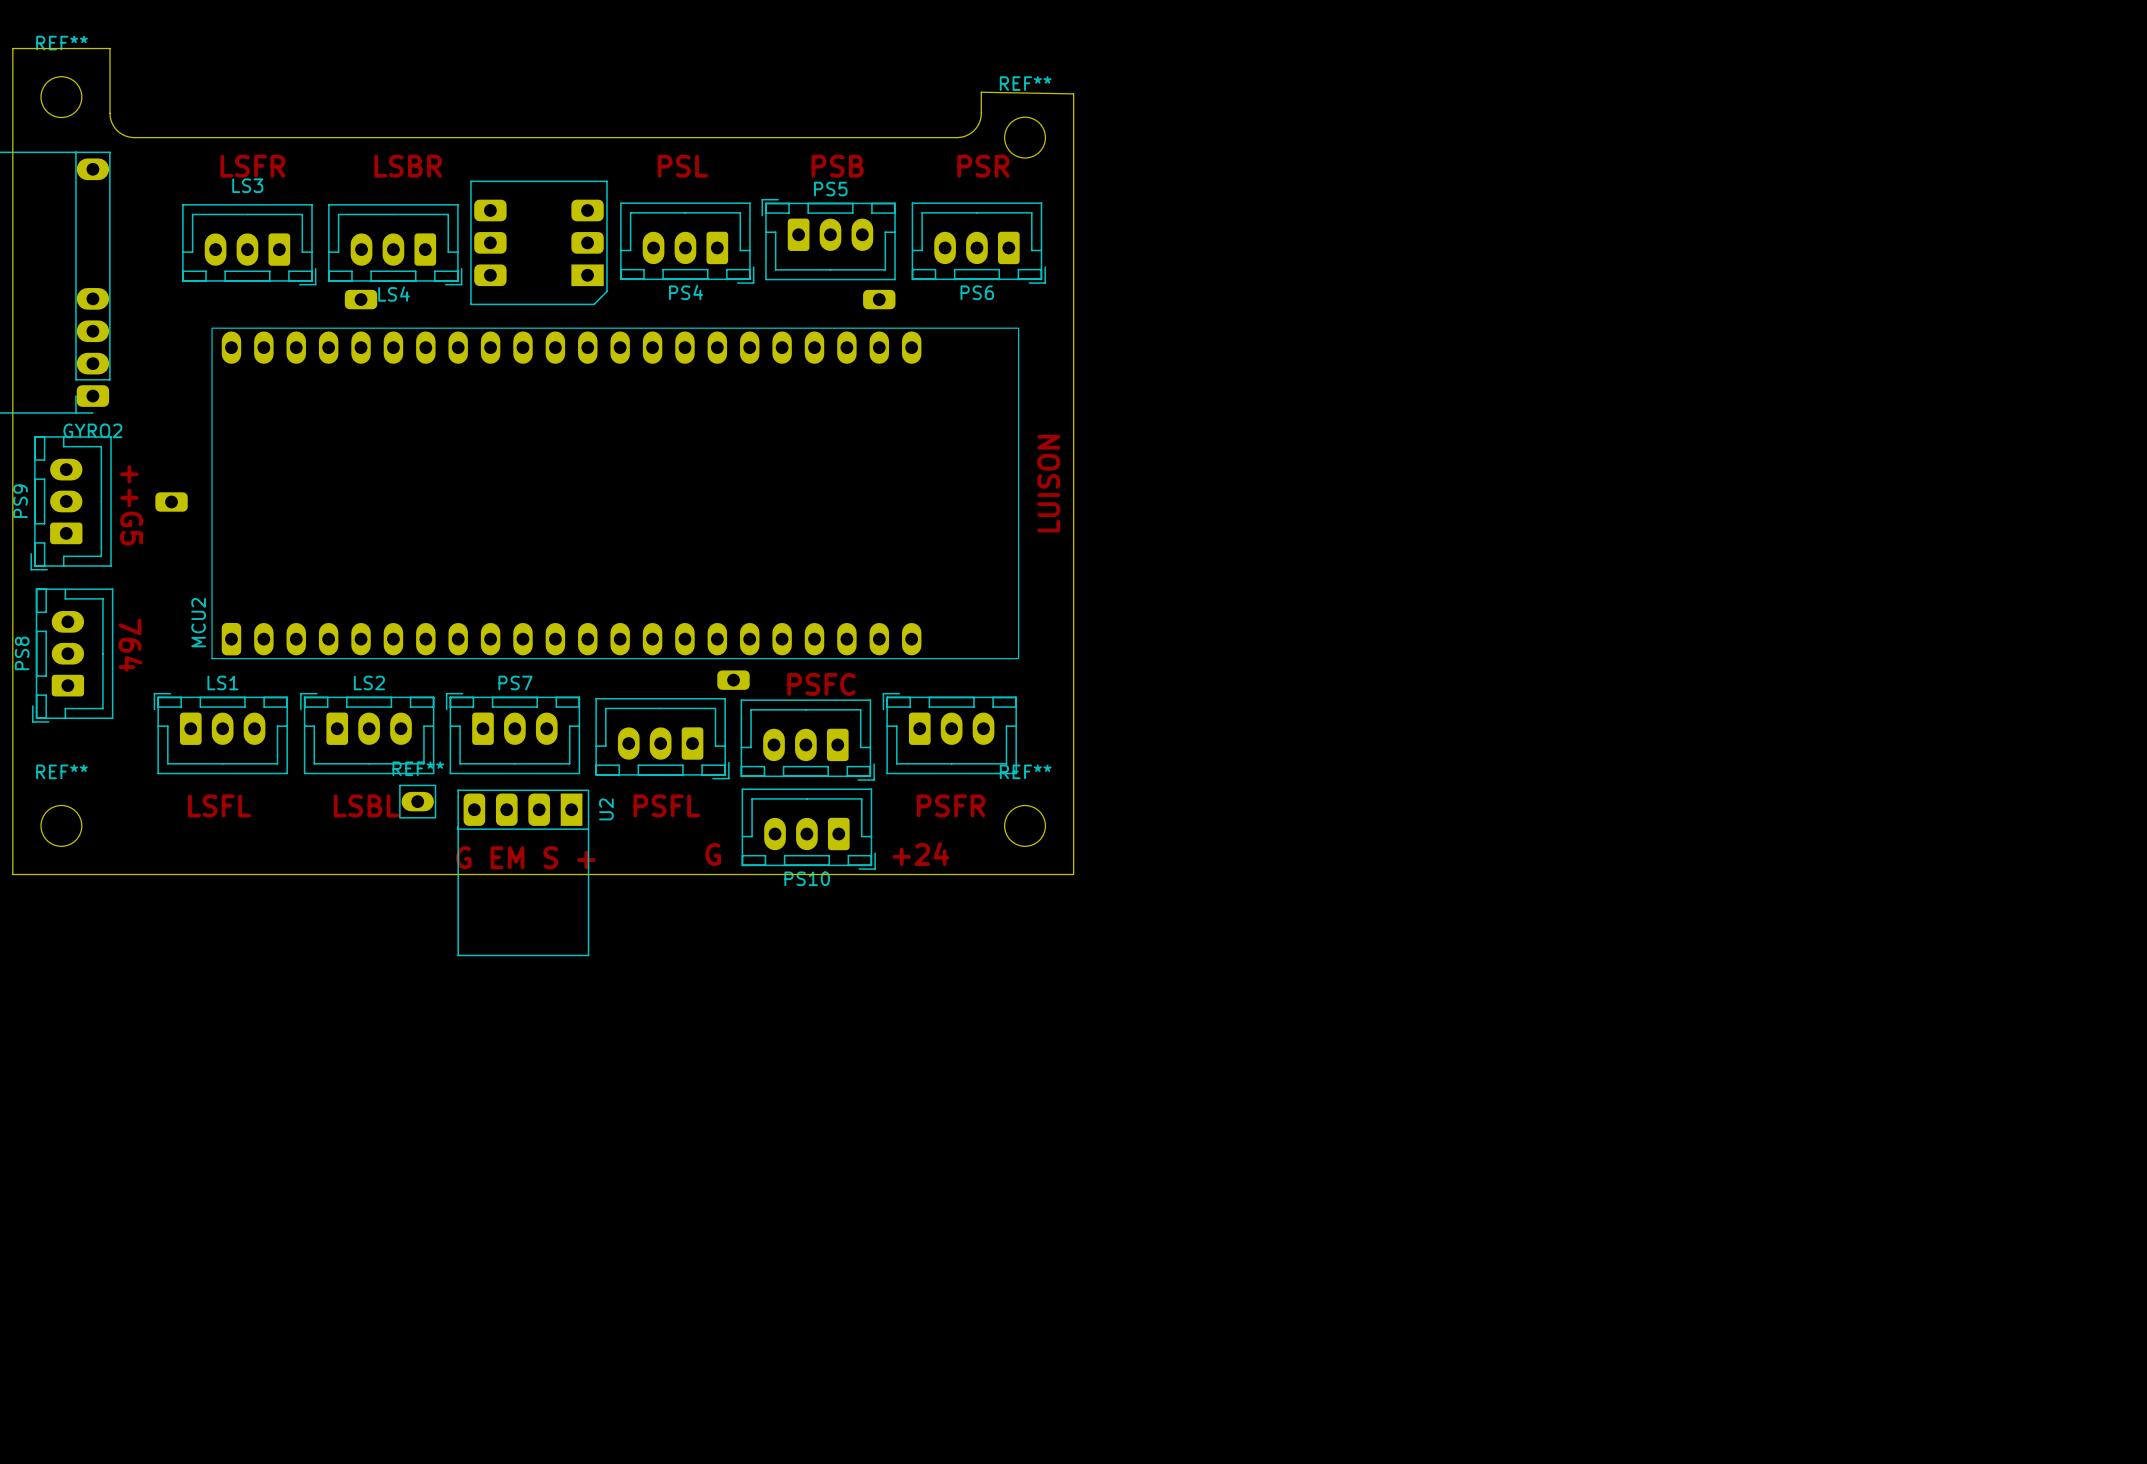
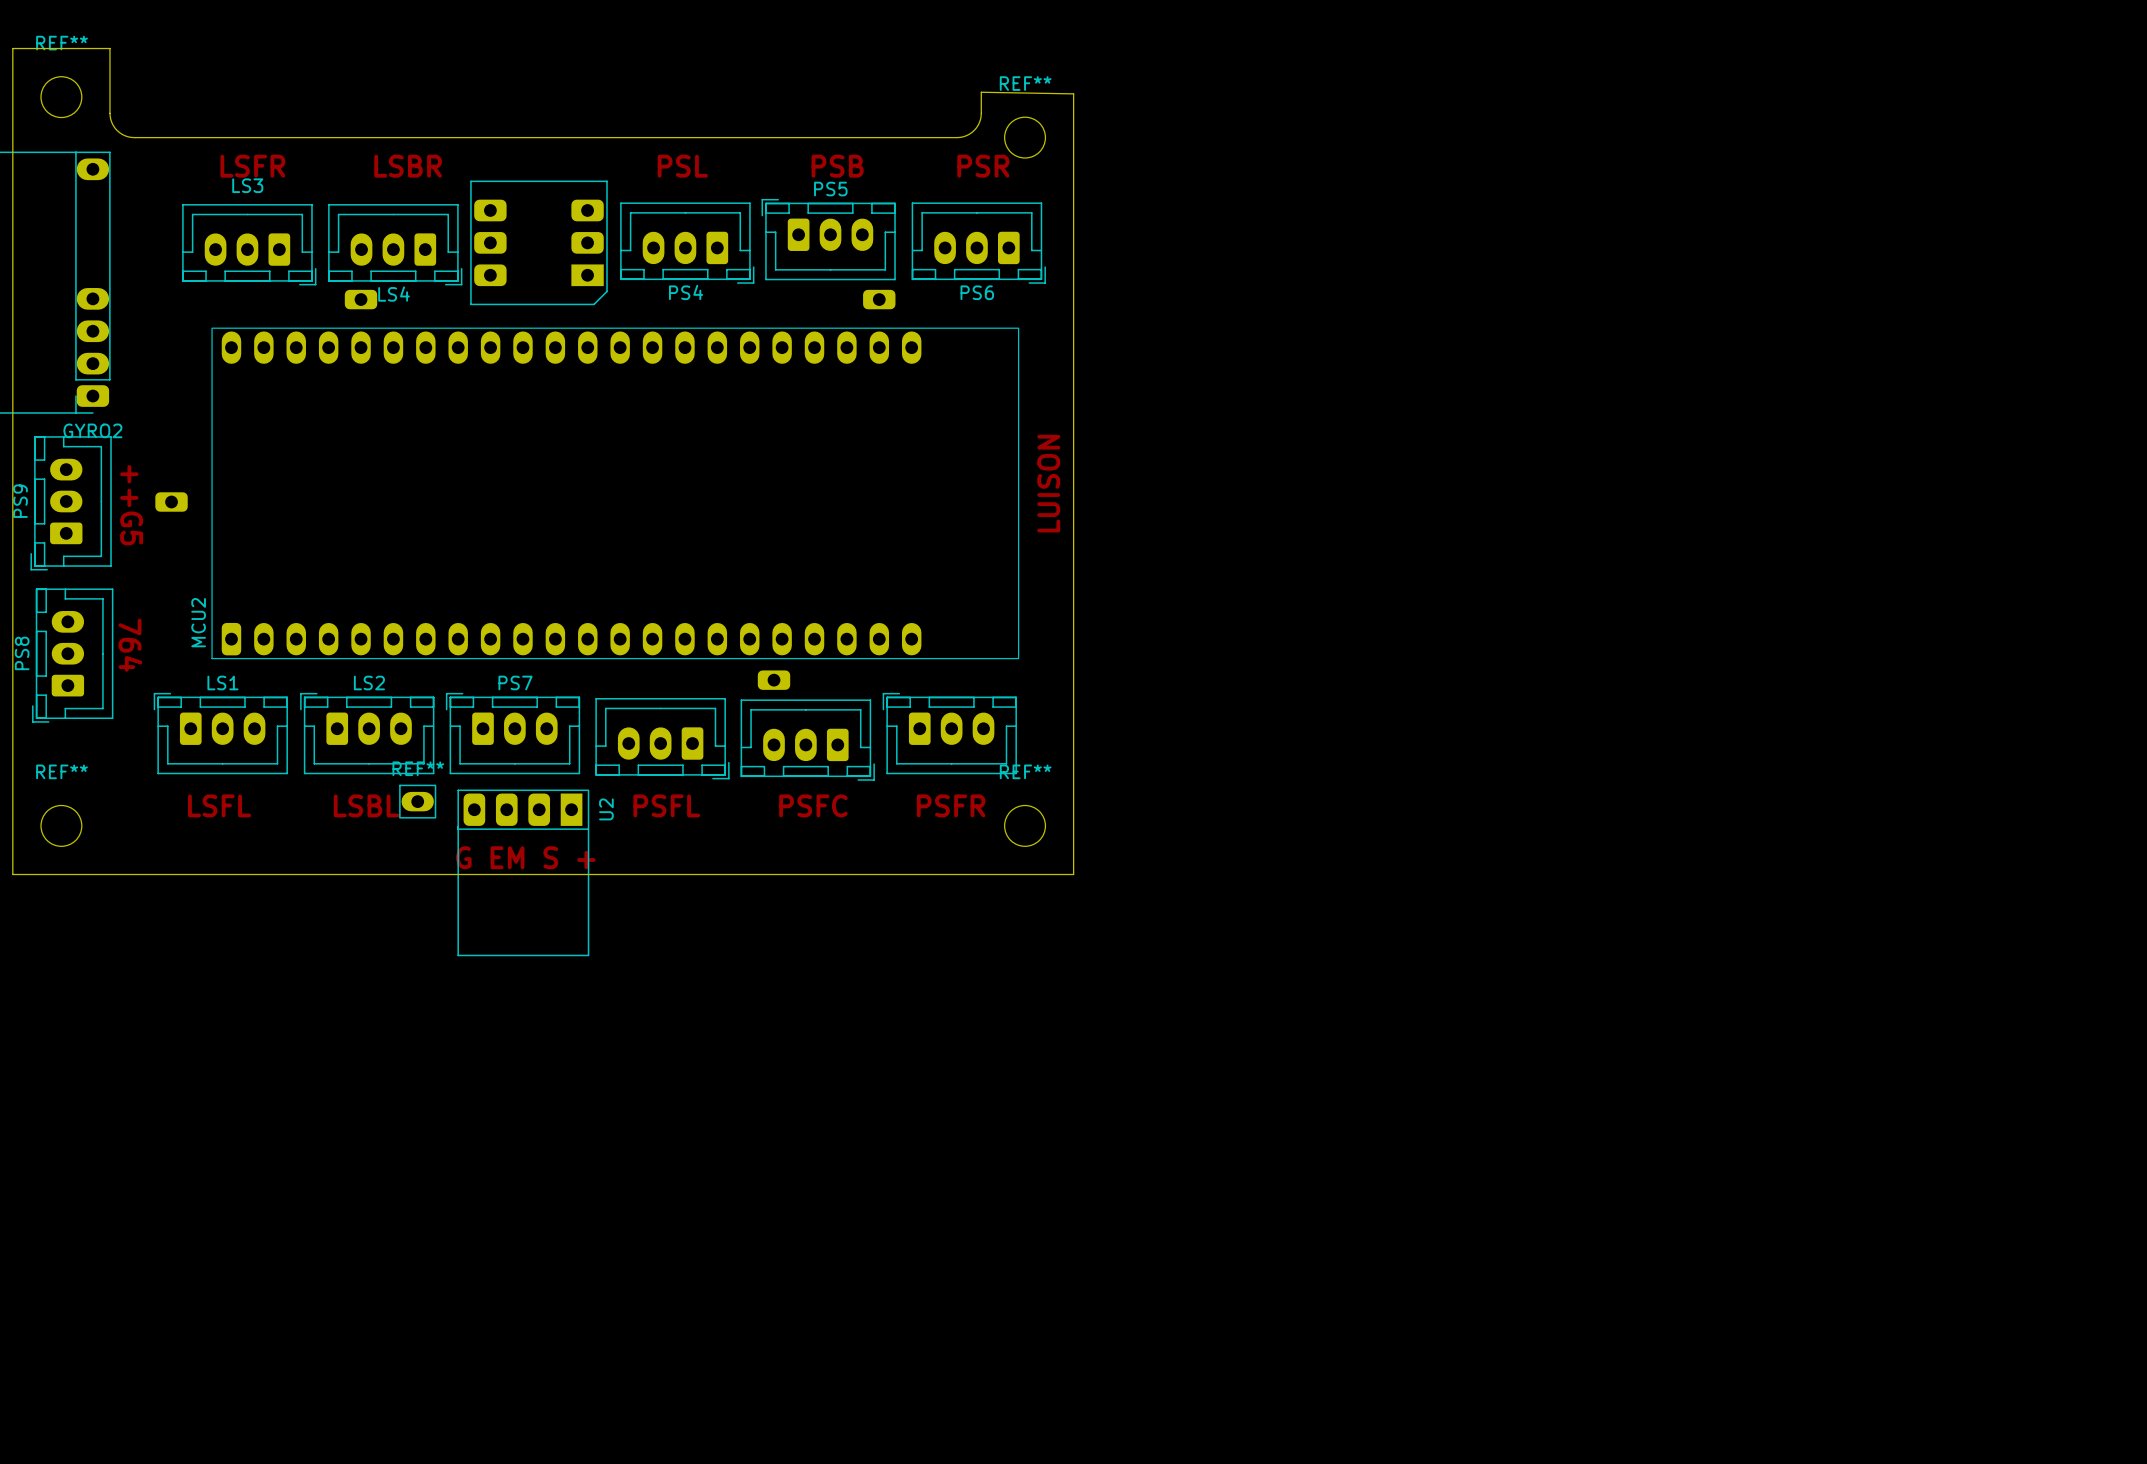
part position: (733, 680) -> (774, 680)
text position: PSFC (821, 684) -> PSFC (813, 805)
PS10: (808, 829) -> none
text: G (713, 854) -> none
text: +24 (920, 854) -> none

